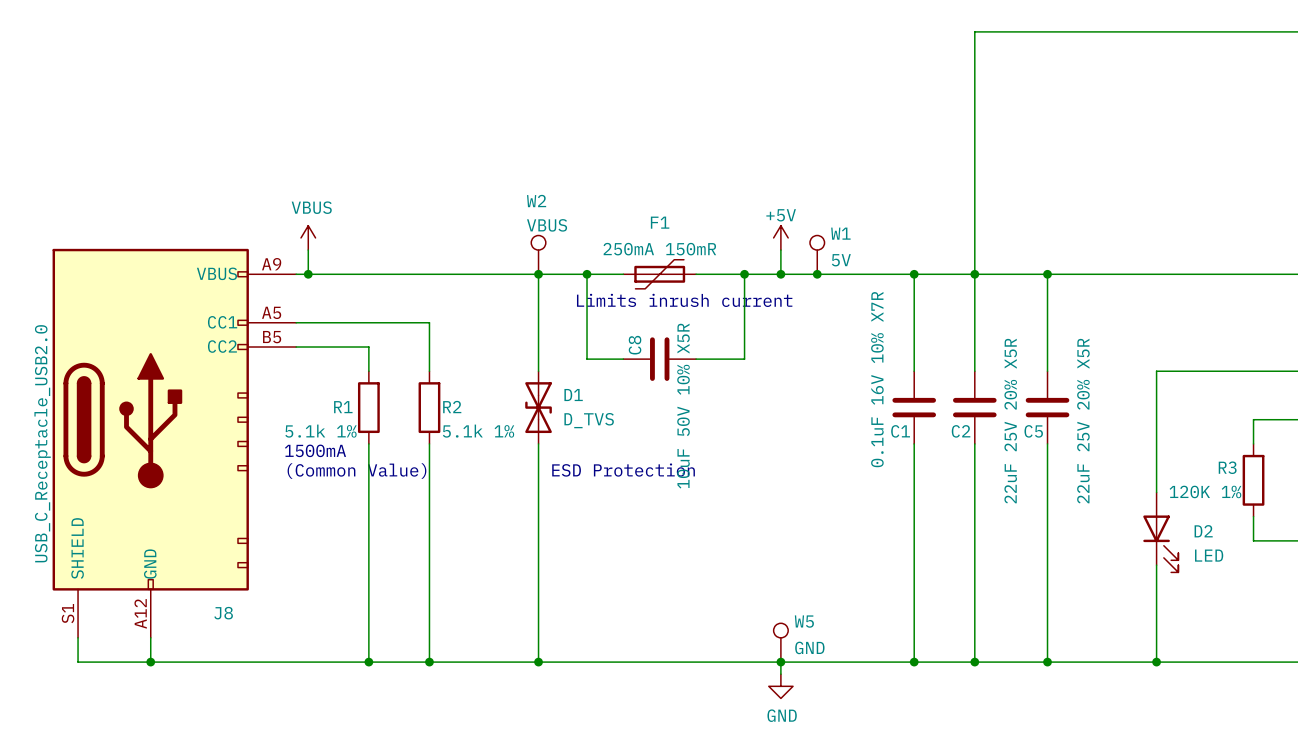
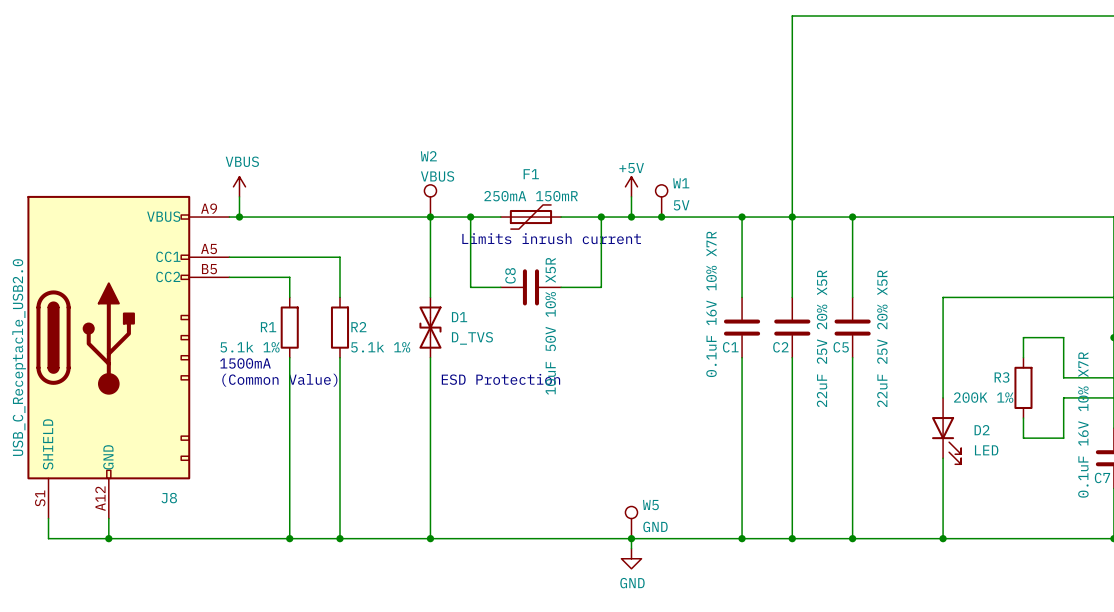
R3 value: 120K 1% (1205, 491) -> 200K 1% (983, 397)

